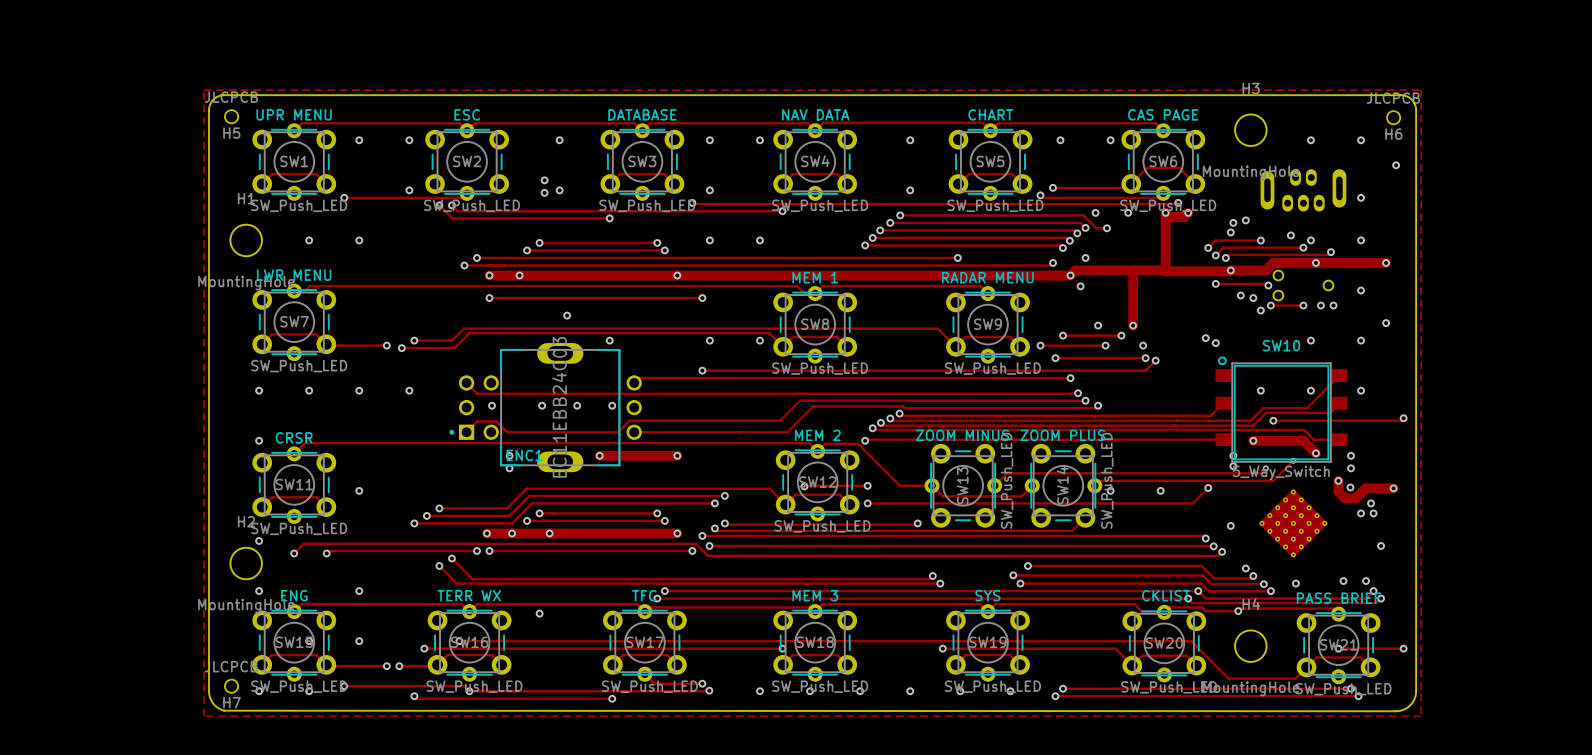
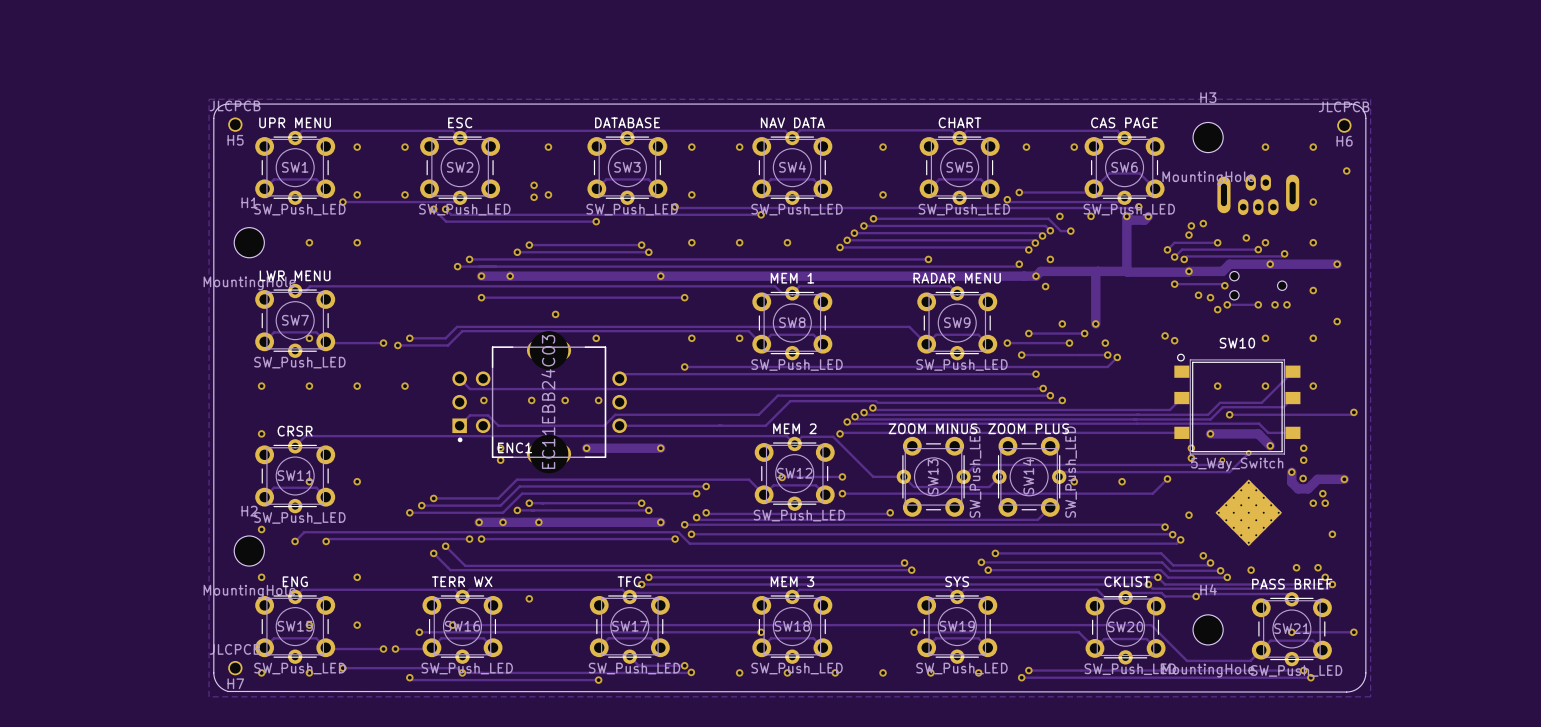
via: none -> (357, 194)
via: none -> (787, 242)
via: none -> (309, 338)
ENC1 footprint: [449, 343, 642, 473] -> [452, 331, 627, 474]
via: none -> (309, 481)

